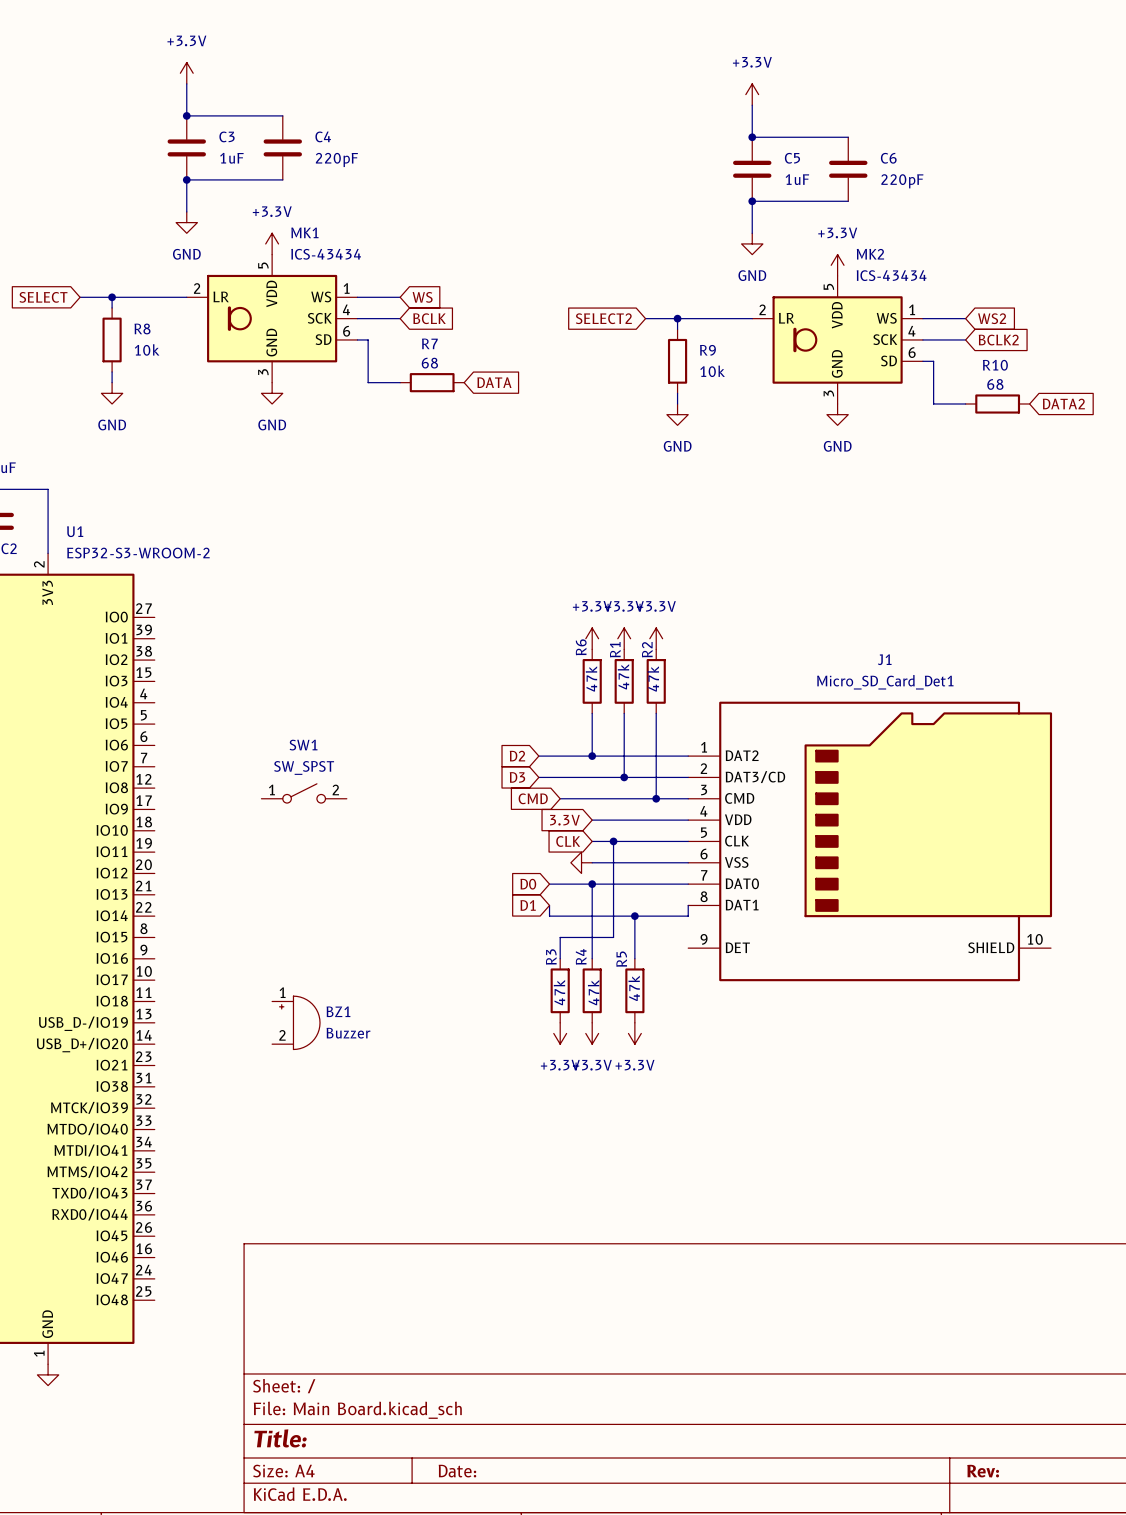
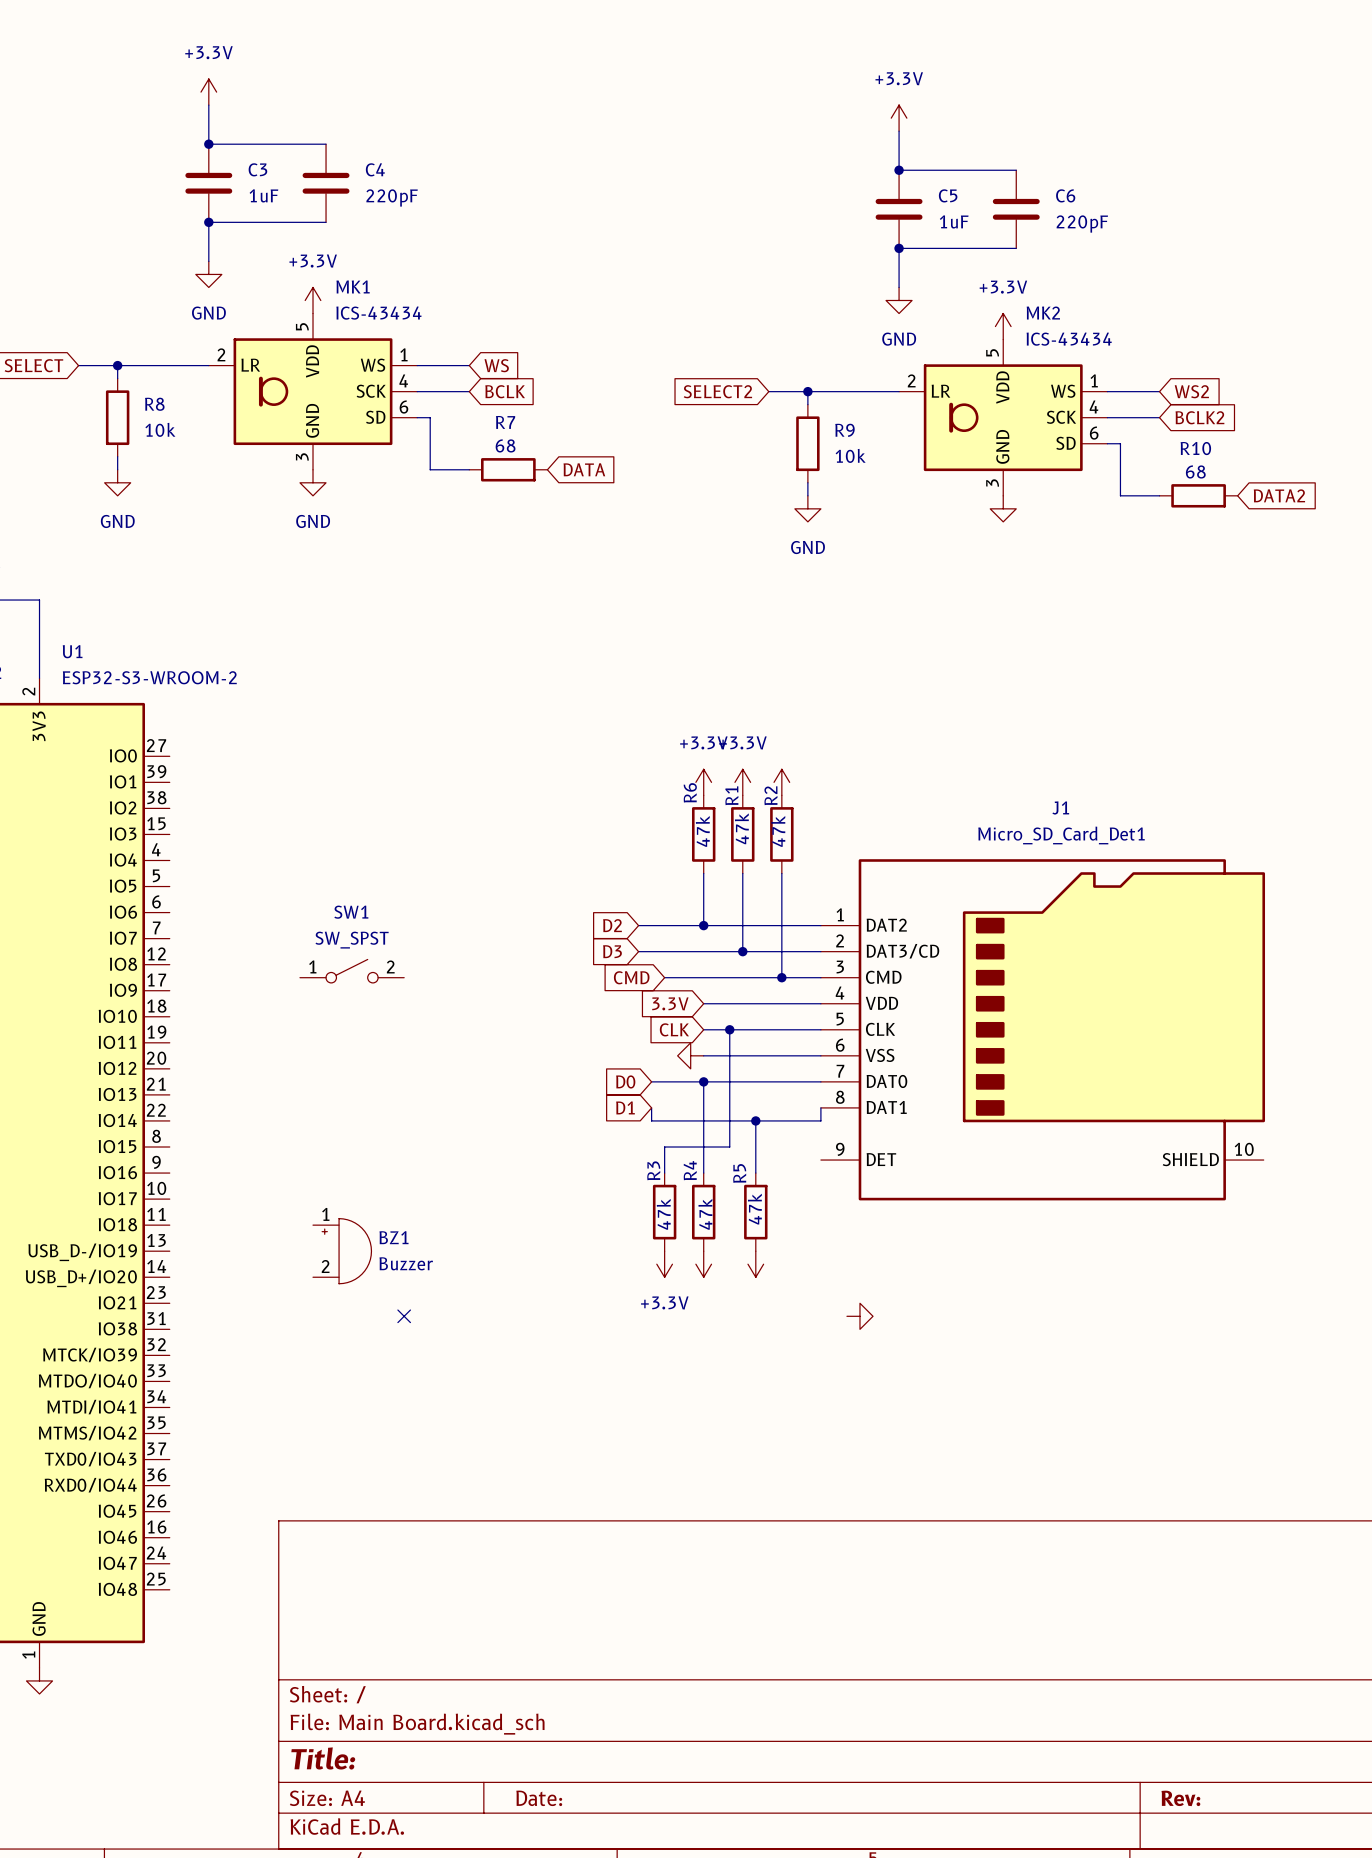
power symbol text: GND (837, 446) -> none
power symbol text: +3.3V (656, 606) -> none
power symbol text: +3.3V (592, 1065) -> none
power symbol text: +3.3V (635, 1065) -> none
no-connect mark: none -> (404, 1316)
power symbol: none -> (859, 1316)

